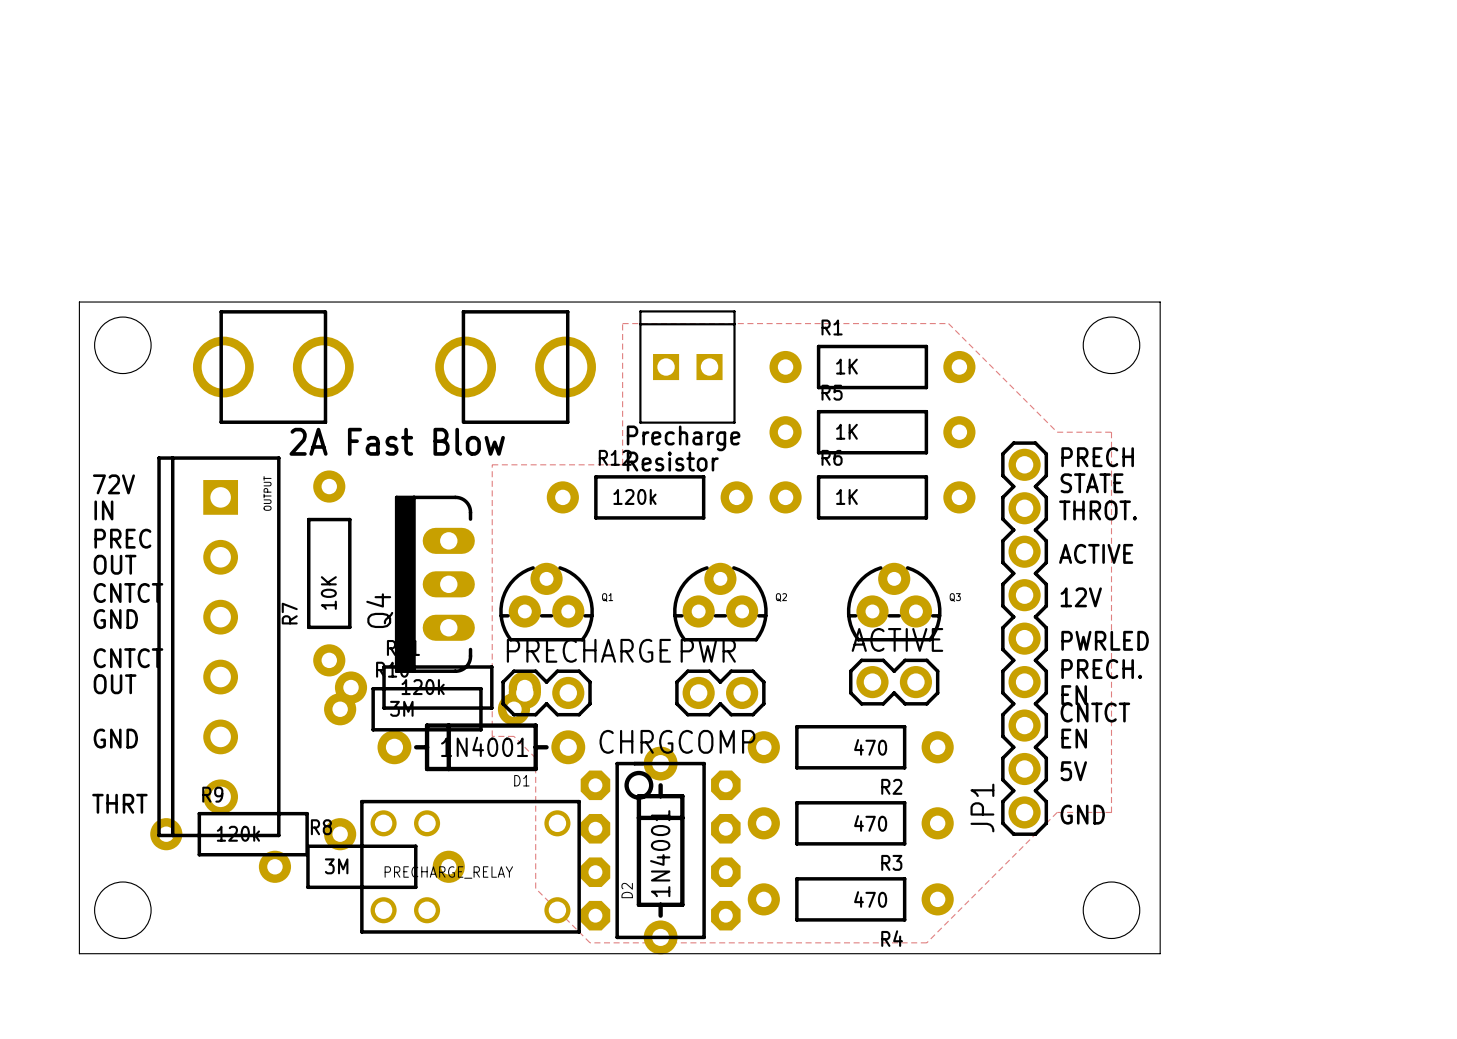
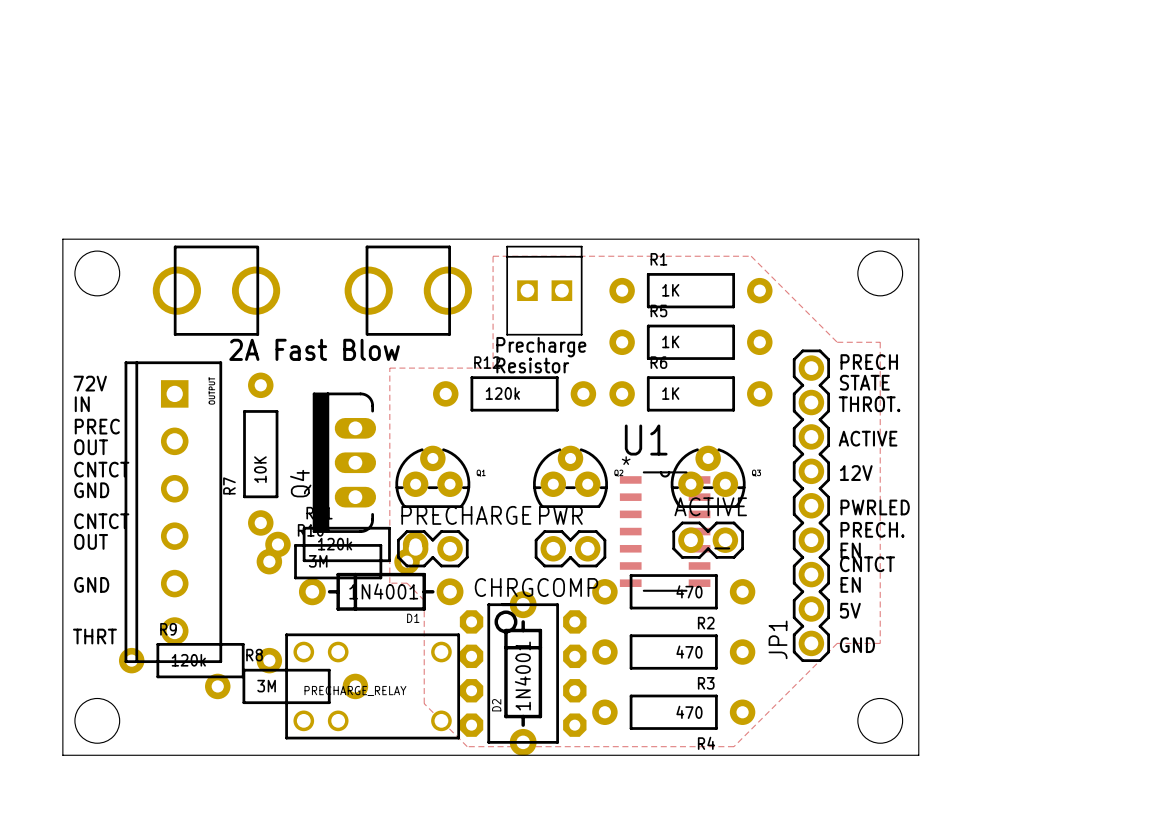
U1: none -> (675, 531)

